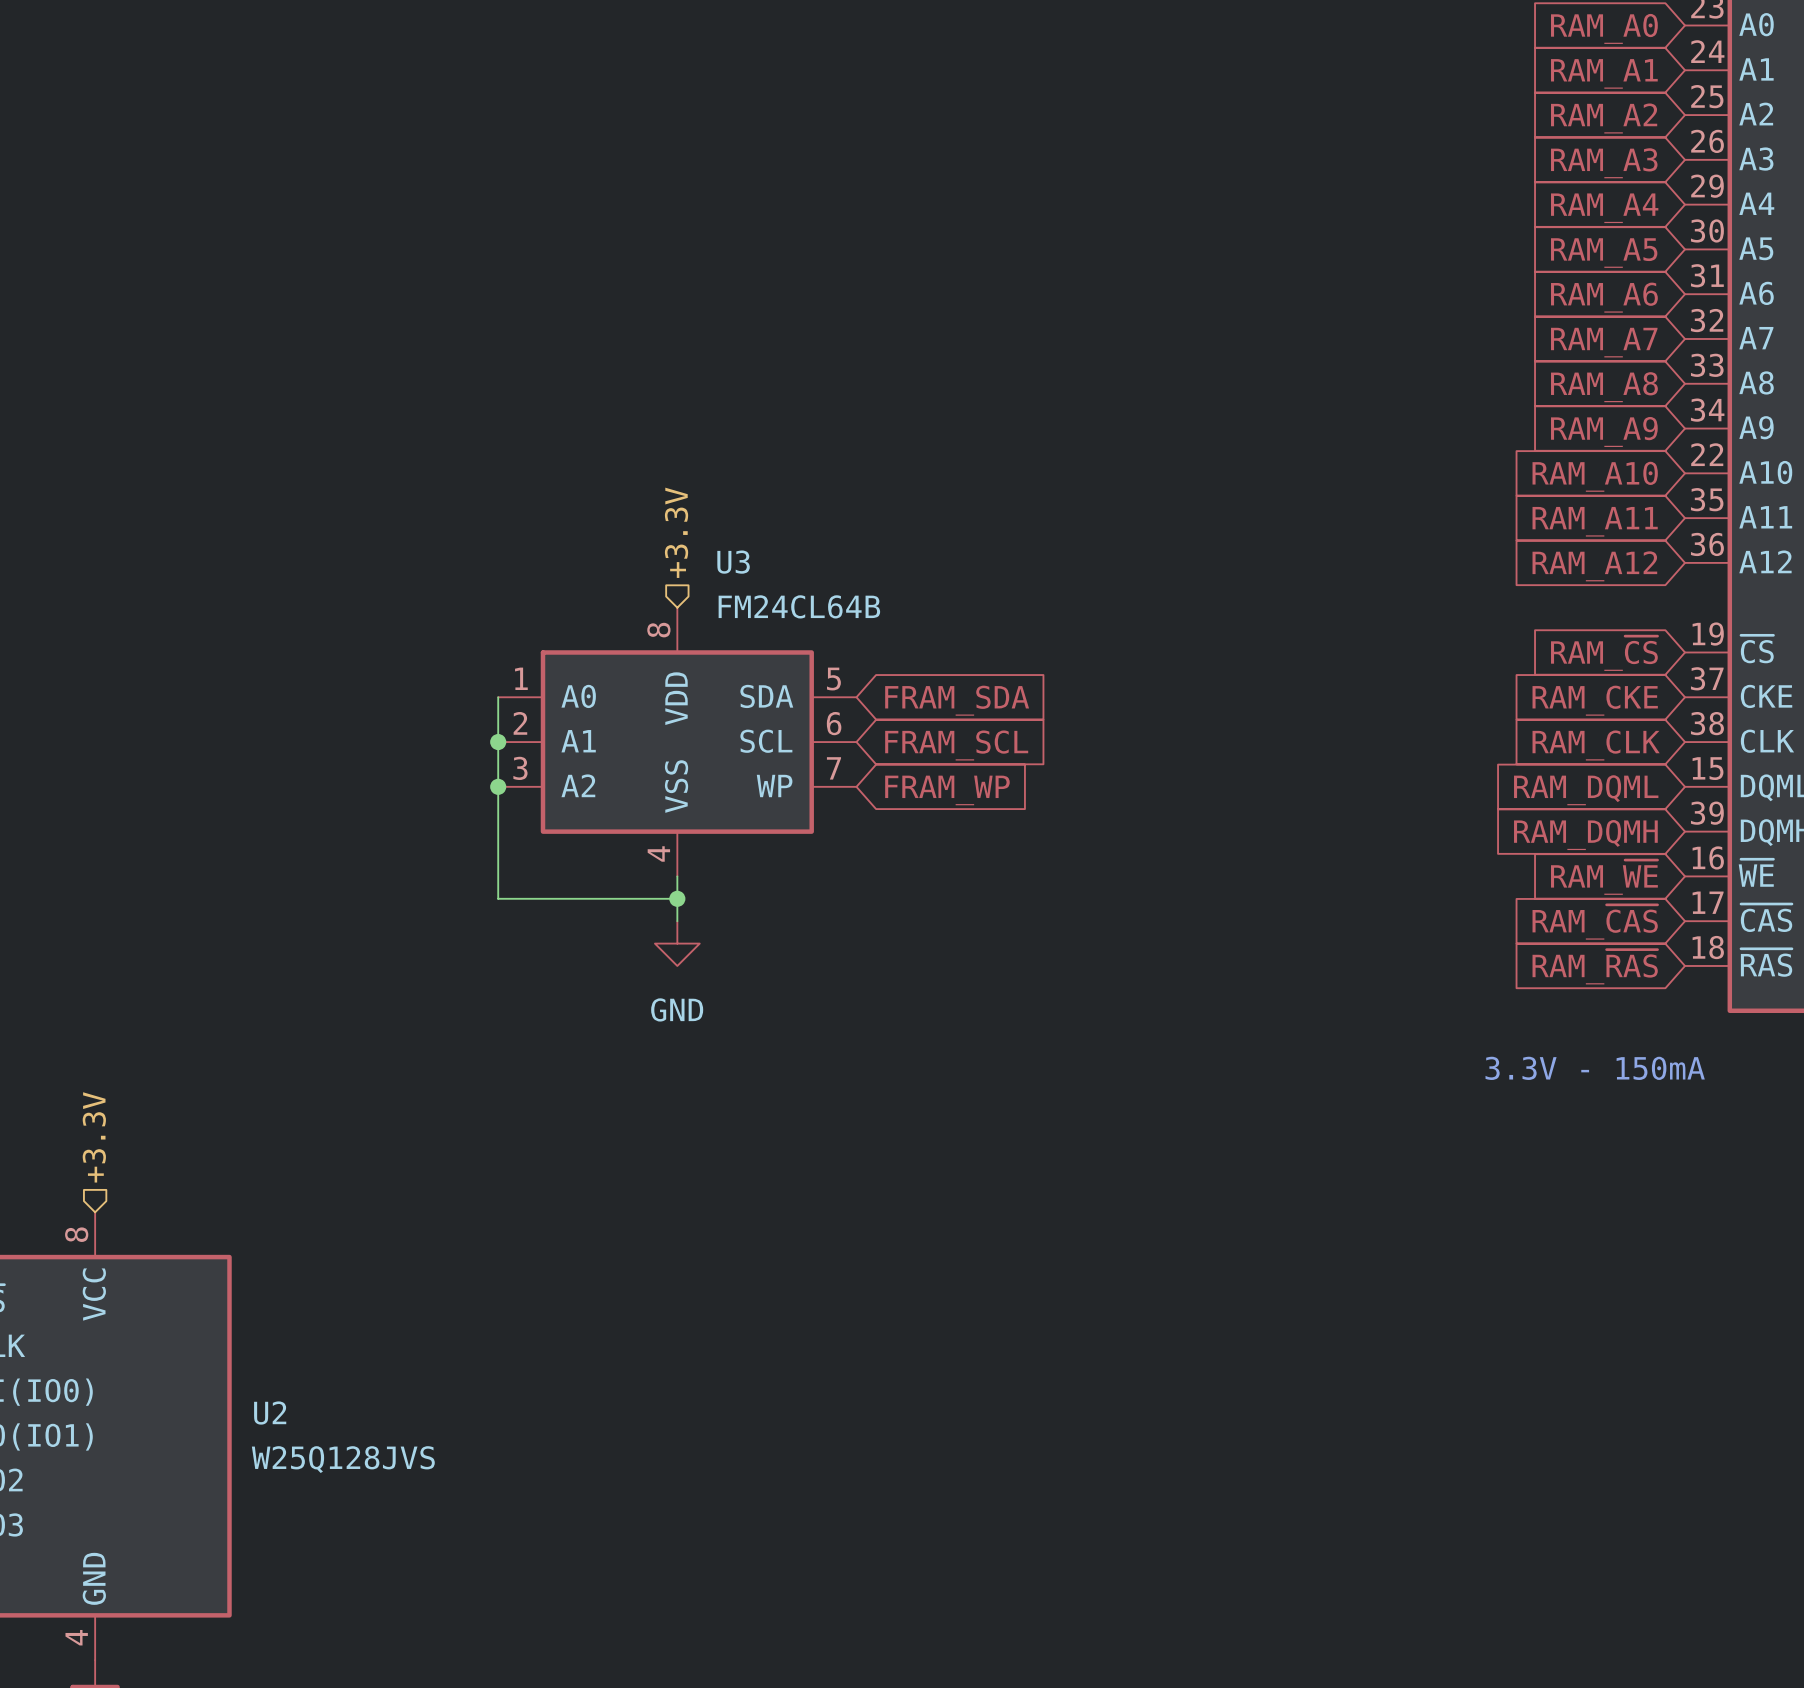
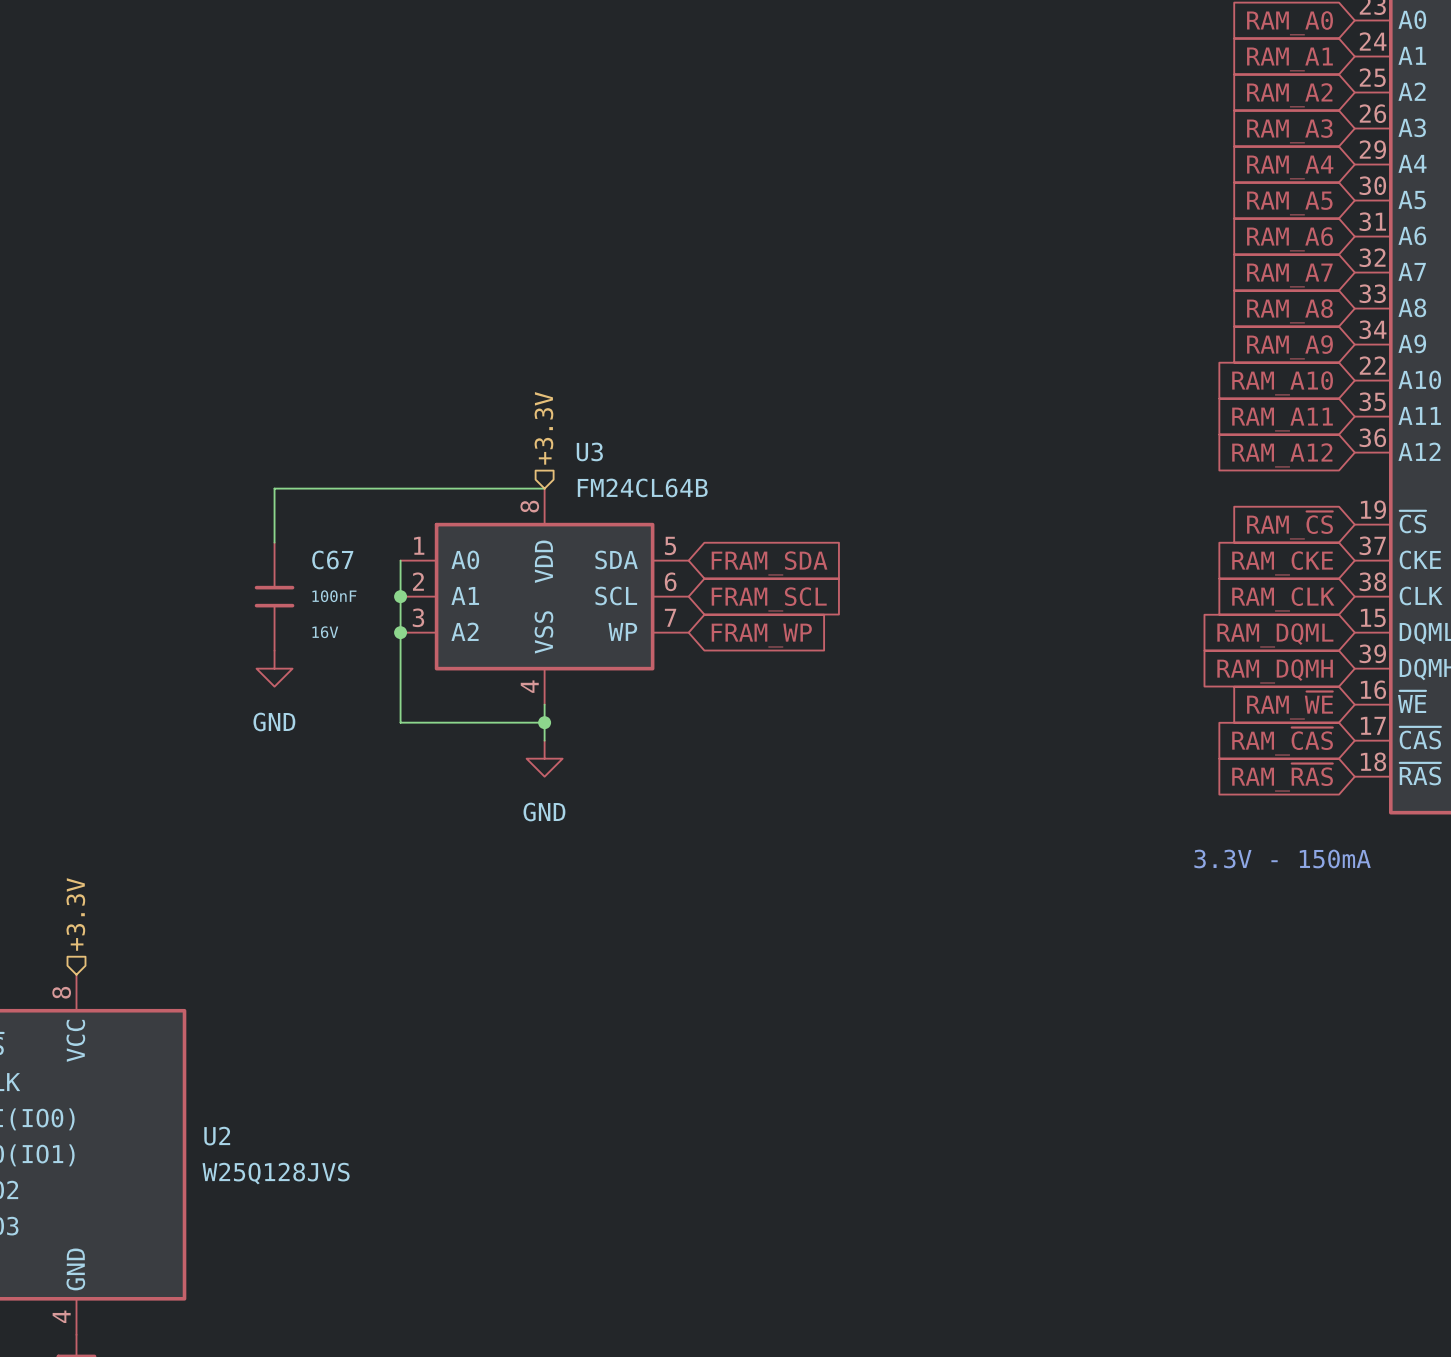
wire: none -> (544, 488) (274, 488) (274, 542)
C67: none -> 100nF (274, 596)
power symbol: none -> GND (274, 668)

